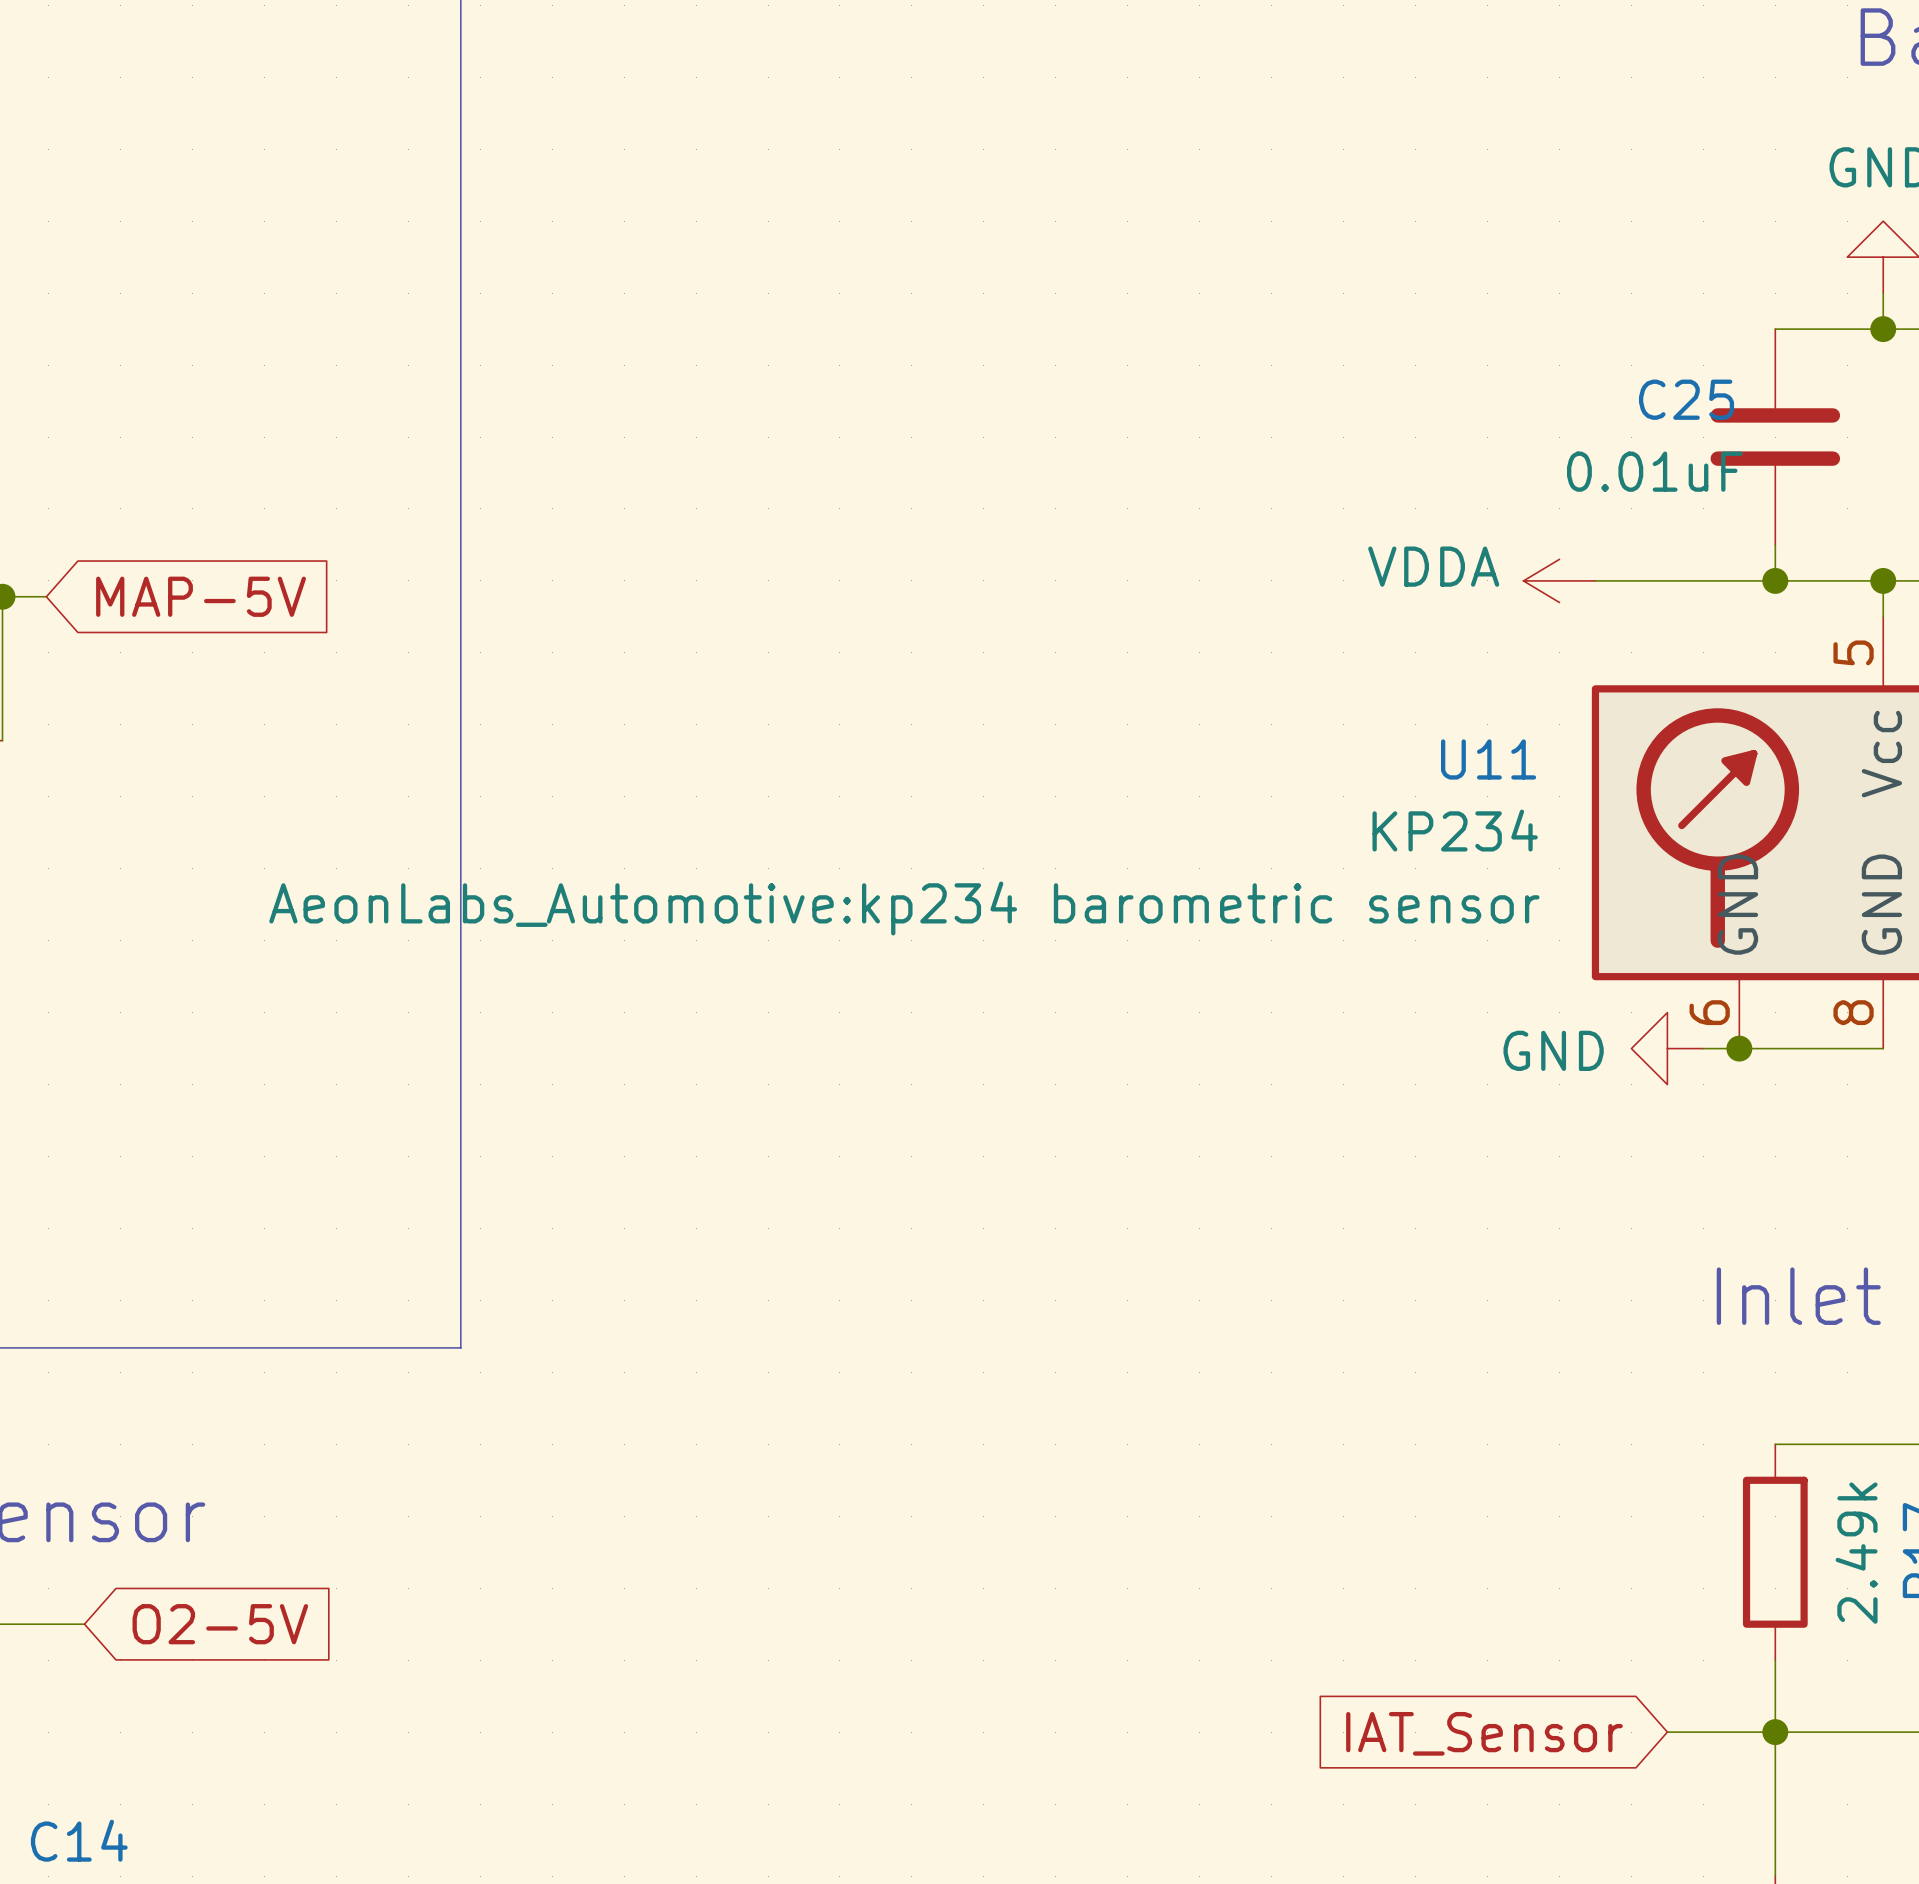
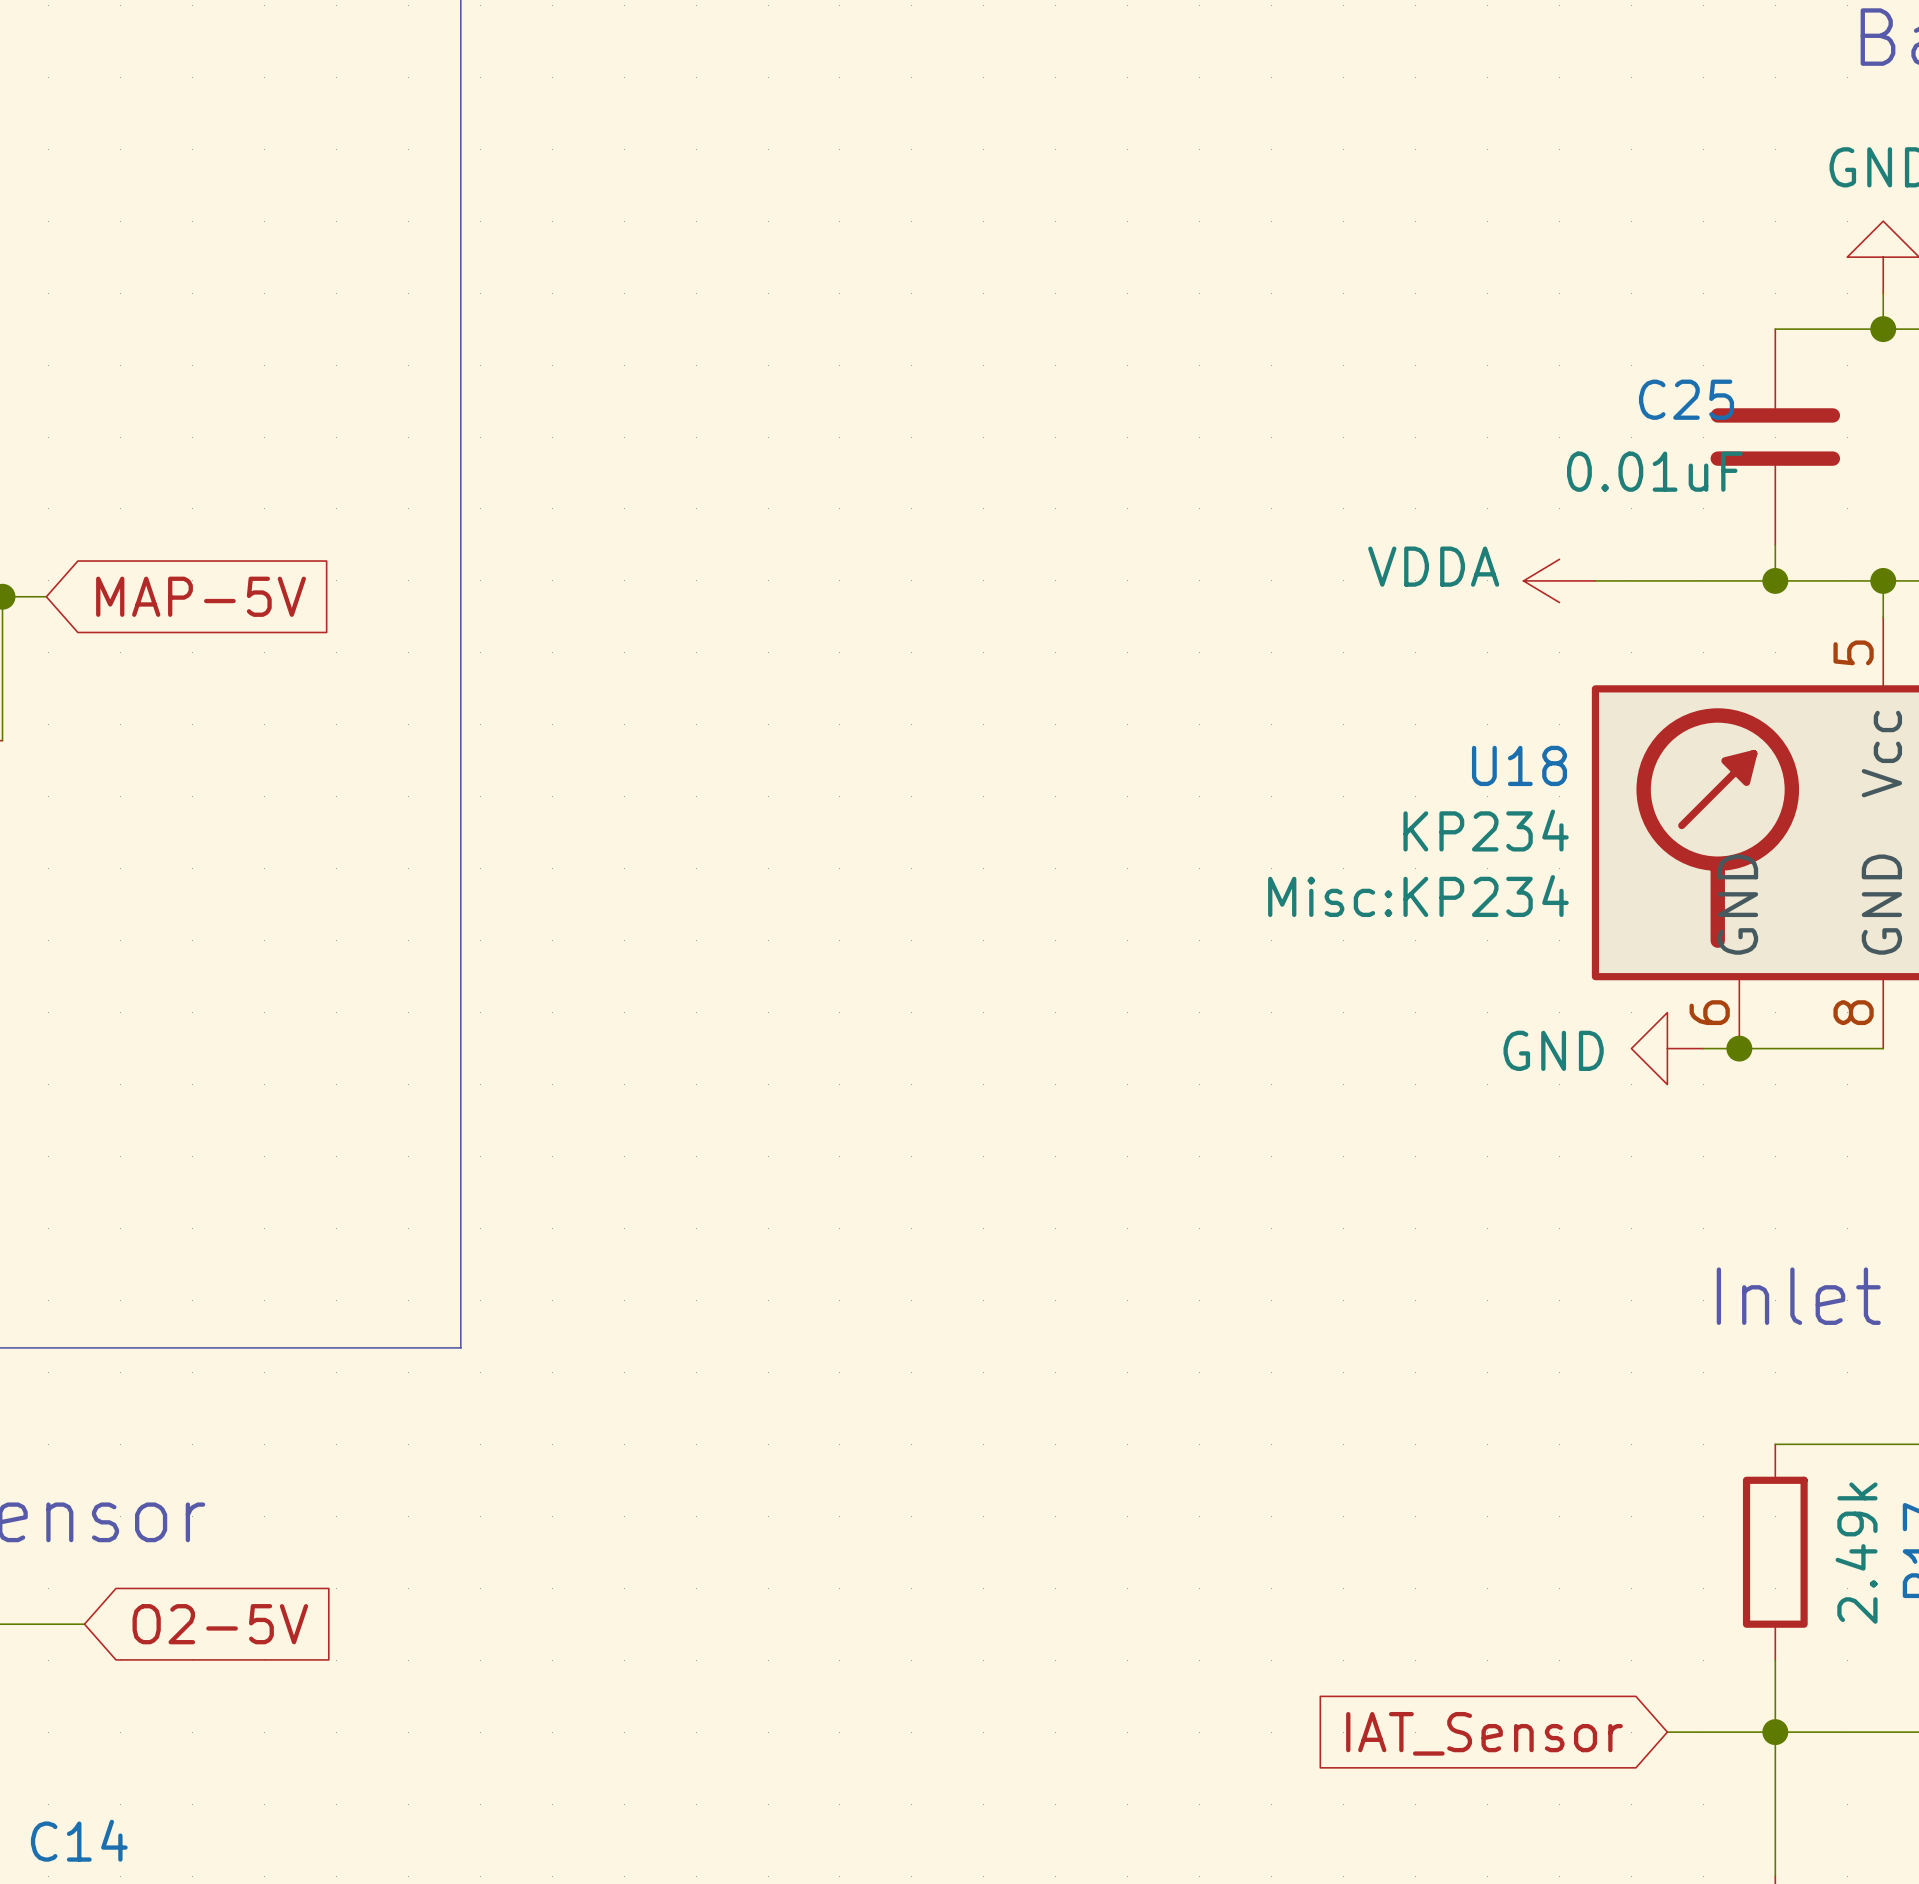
U11 name: U11 (1488, 759) -> U18 (1519, 765)
U11 value position: KP234 (1455, 830) -> KP234 (1486, 830)
U11 text: AeonLabs_Automotive:kp234 barometric sensor (904, 908) -> Misc:KP234 (1418, 896)

